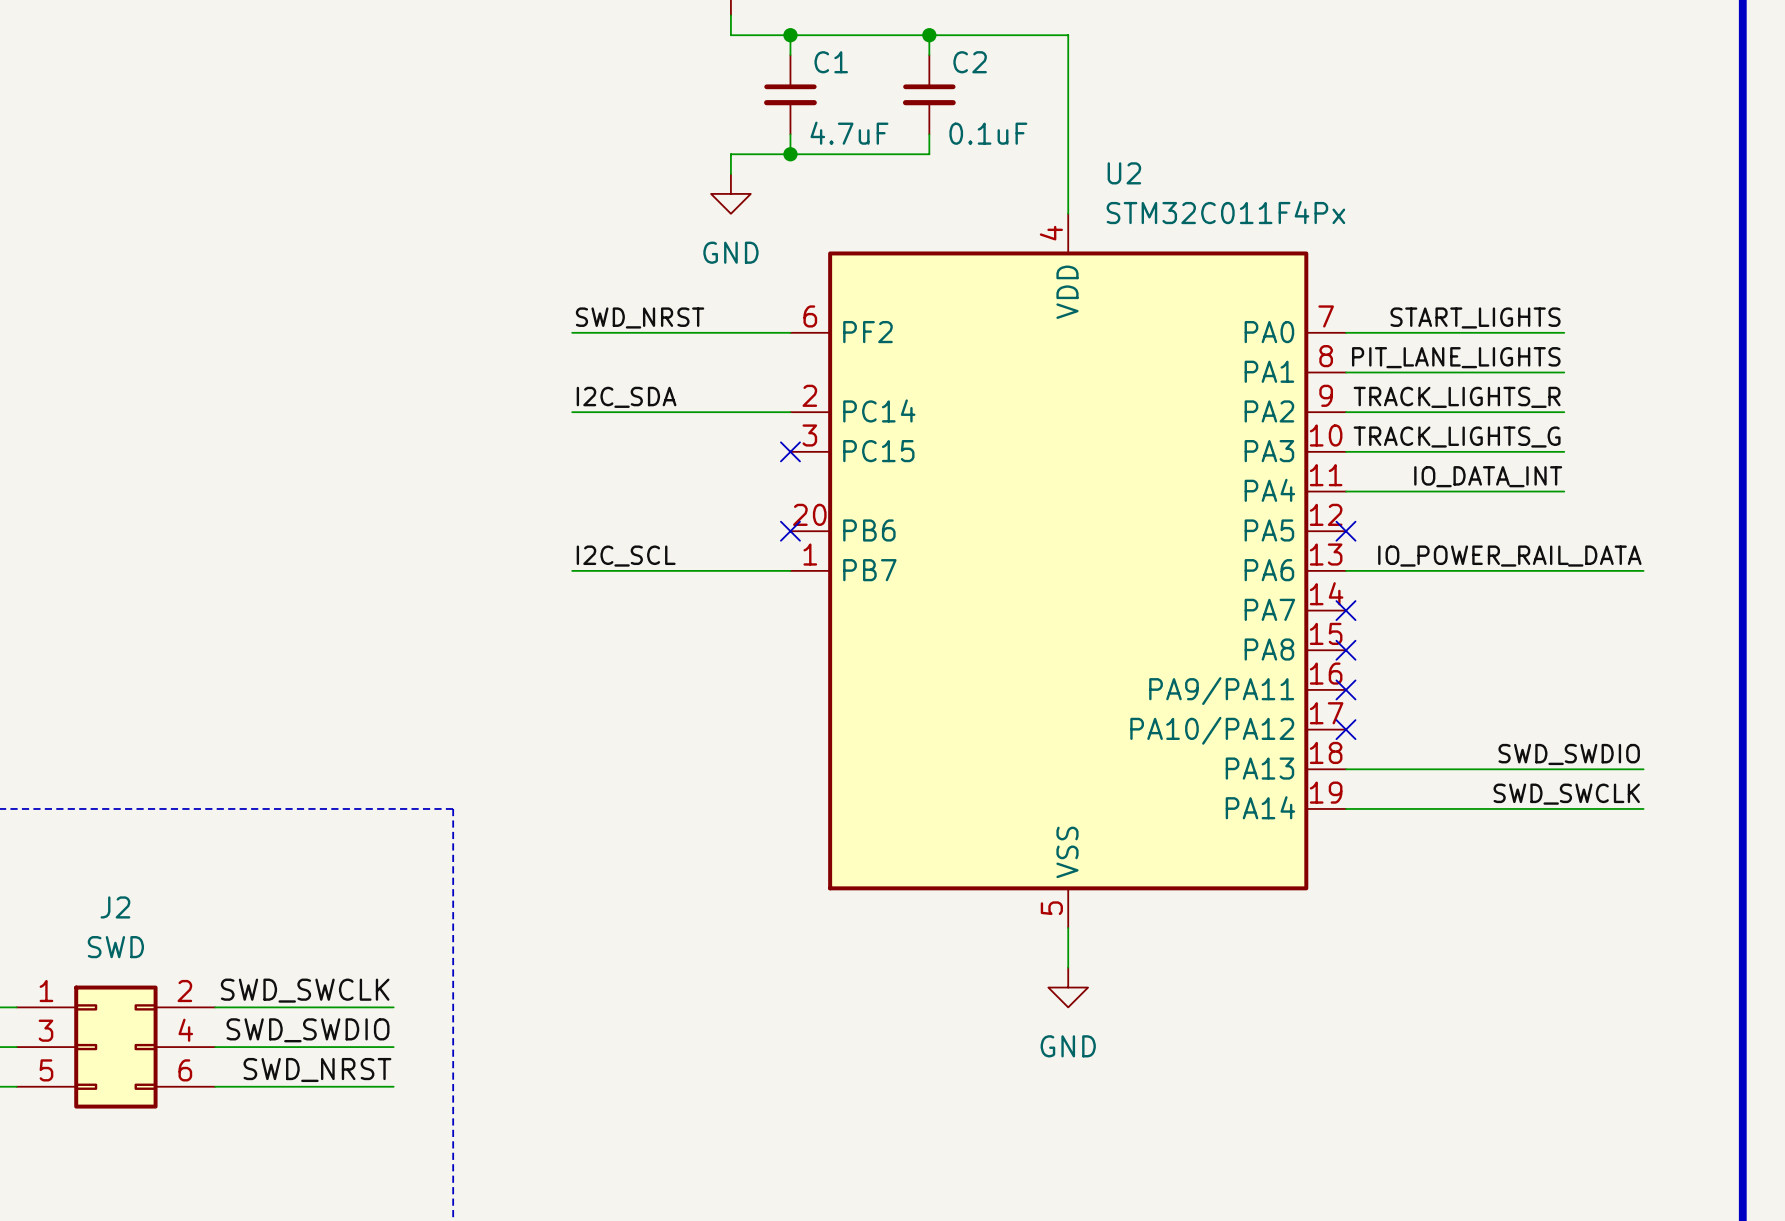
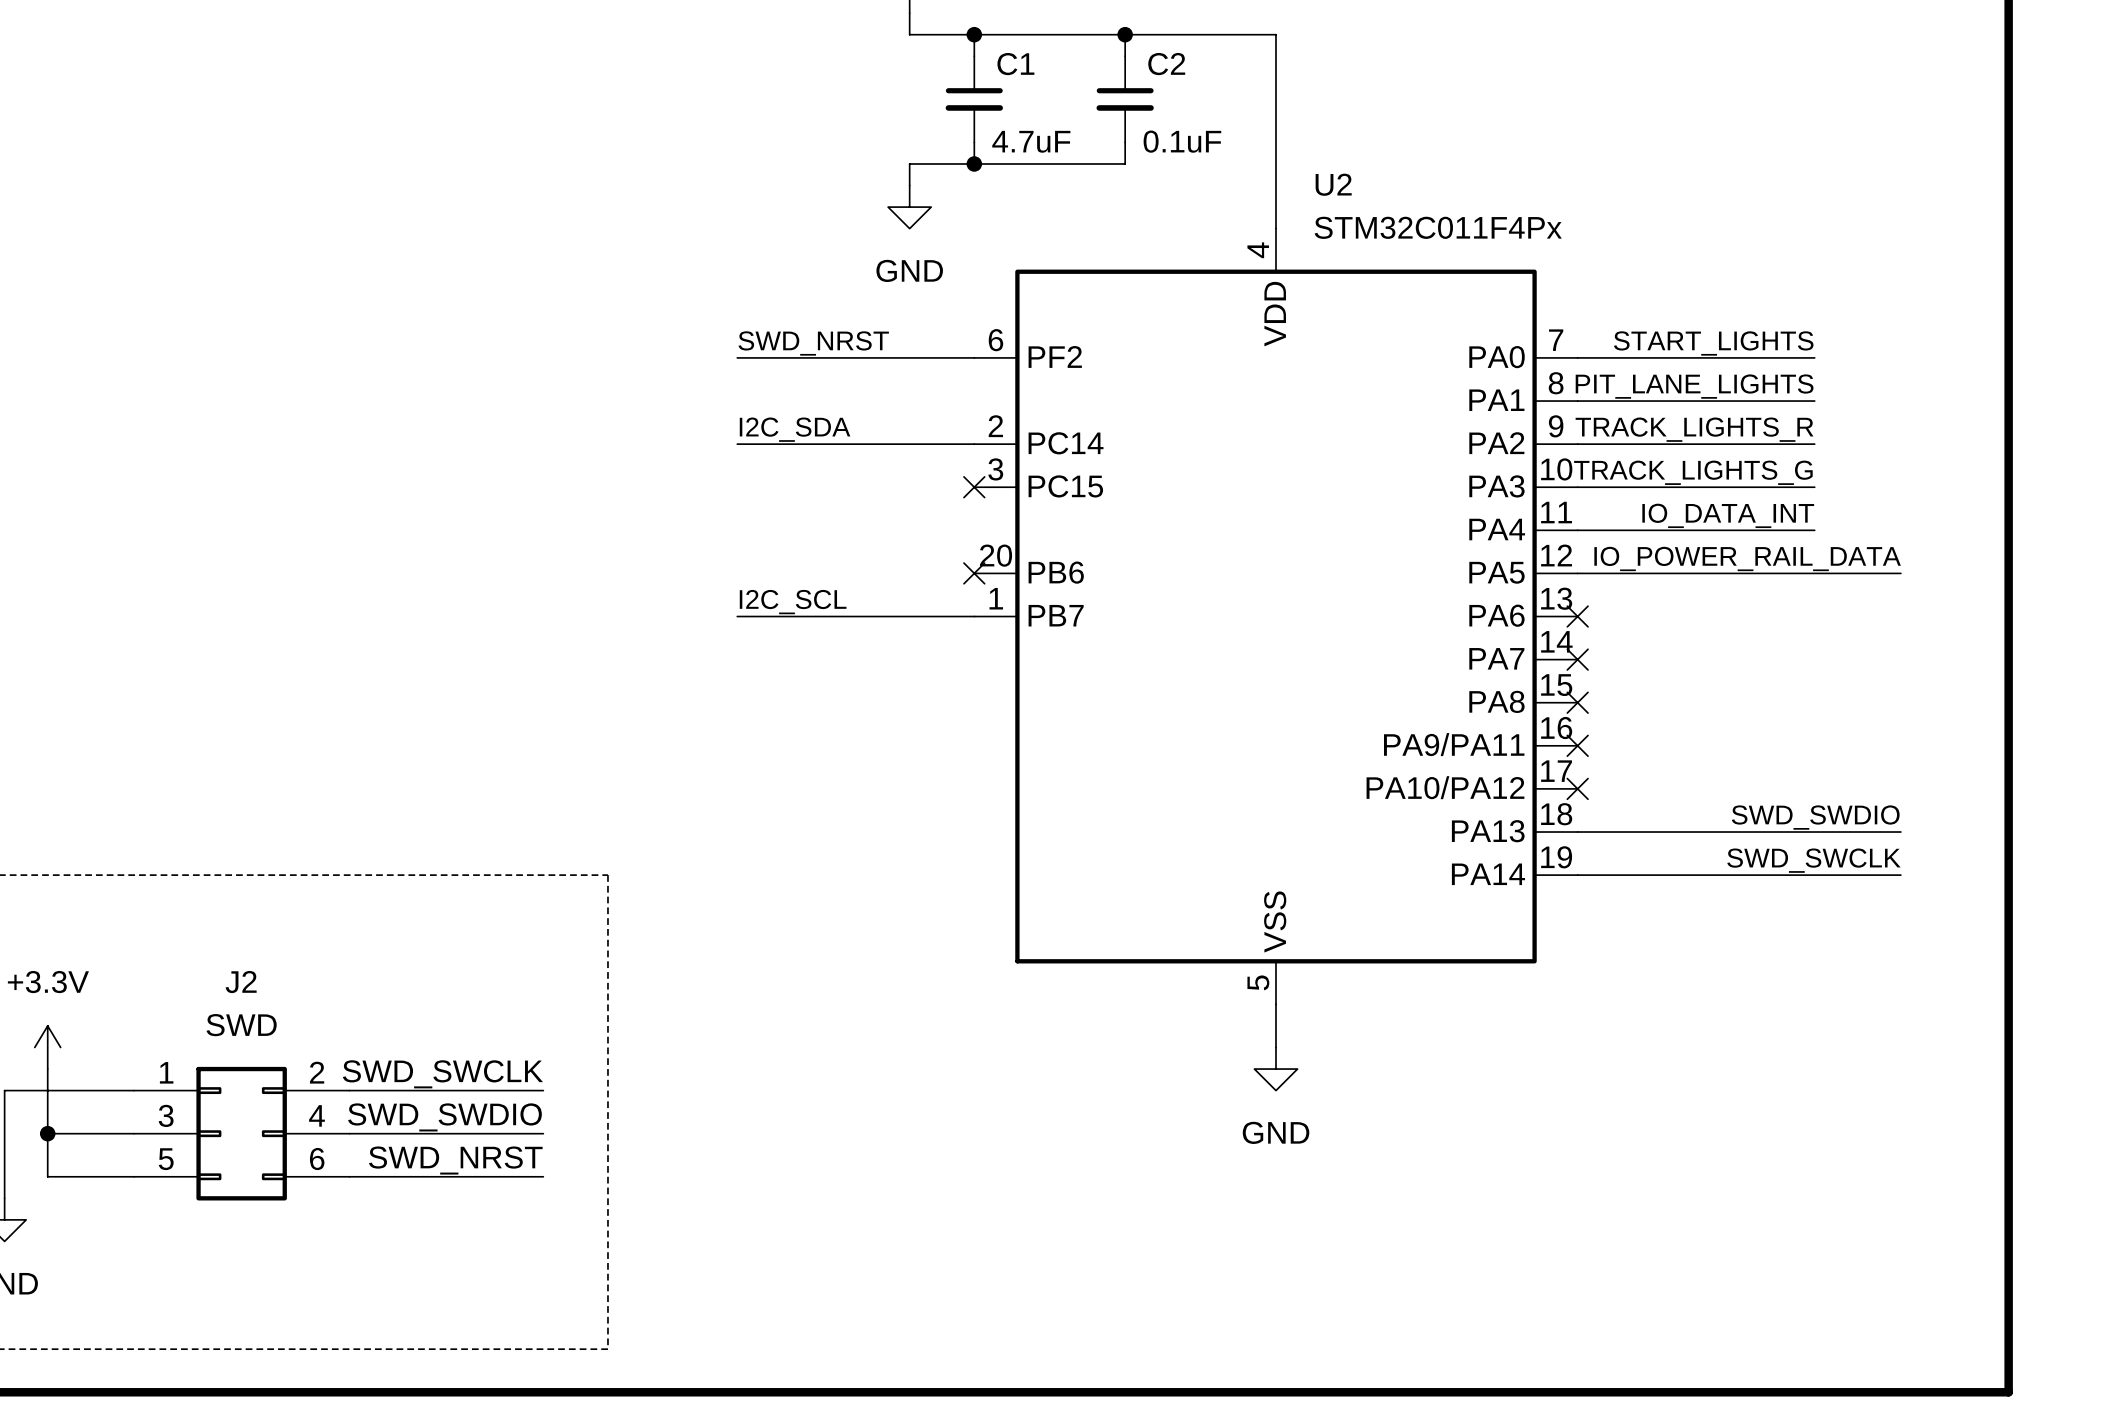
no-connect mark position: (1345, 531) -> (1577, 616)
label position: IO_POWER_RAIL_DATA (1509, 556) -> IO_POWER_RAIL_DATA (1747, 558)
wire: (1345, 570) (1643, 570) -> (1577, 573) (1900, 573)

